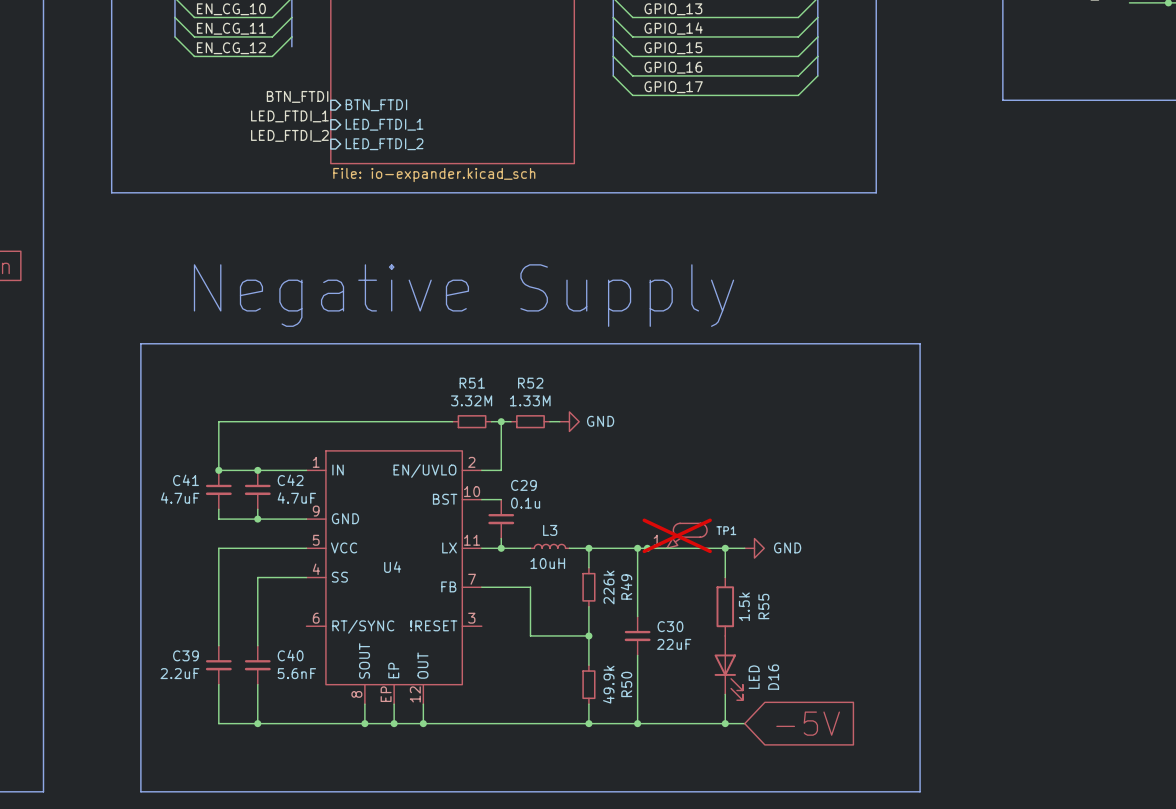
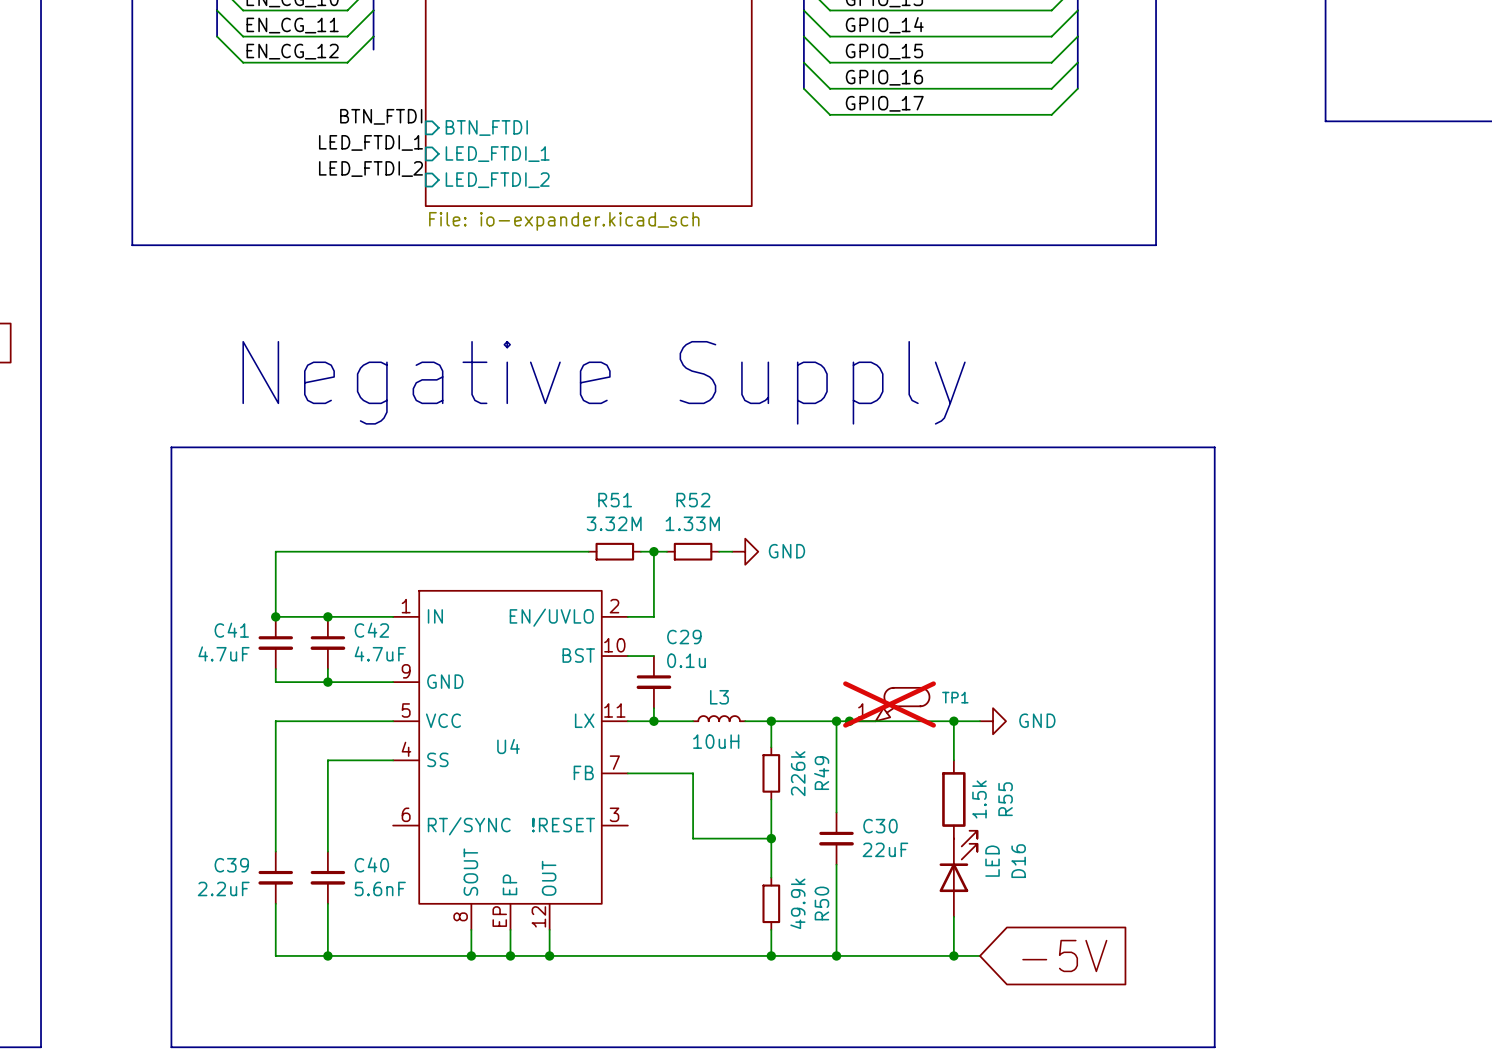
D16 flip: as is (728, 677) -> up-down (958, 861)

